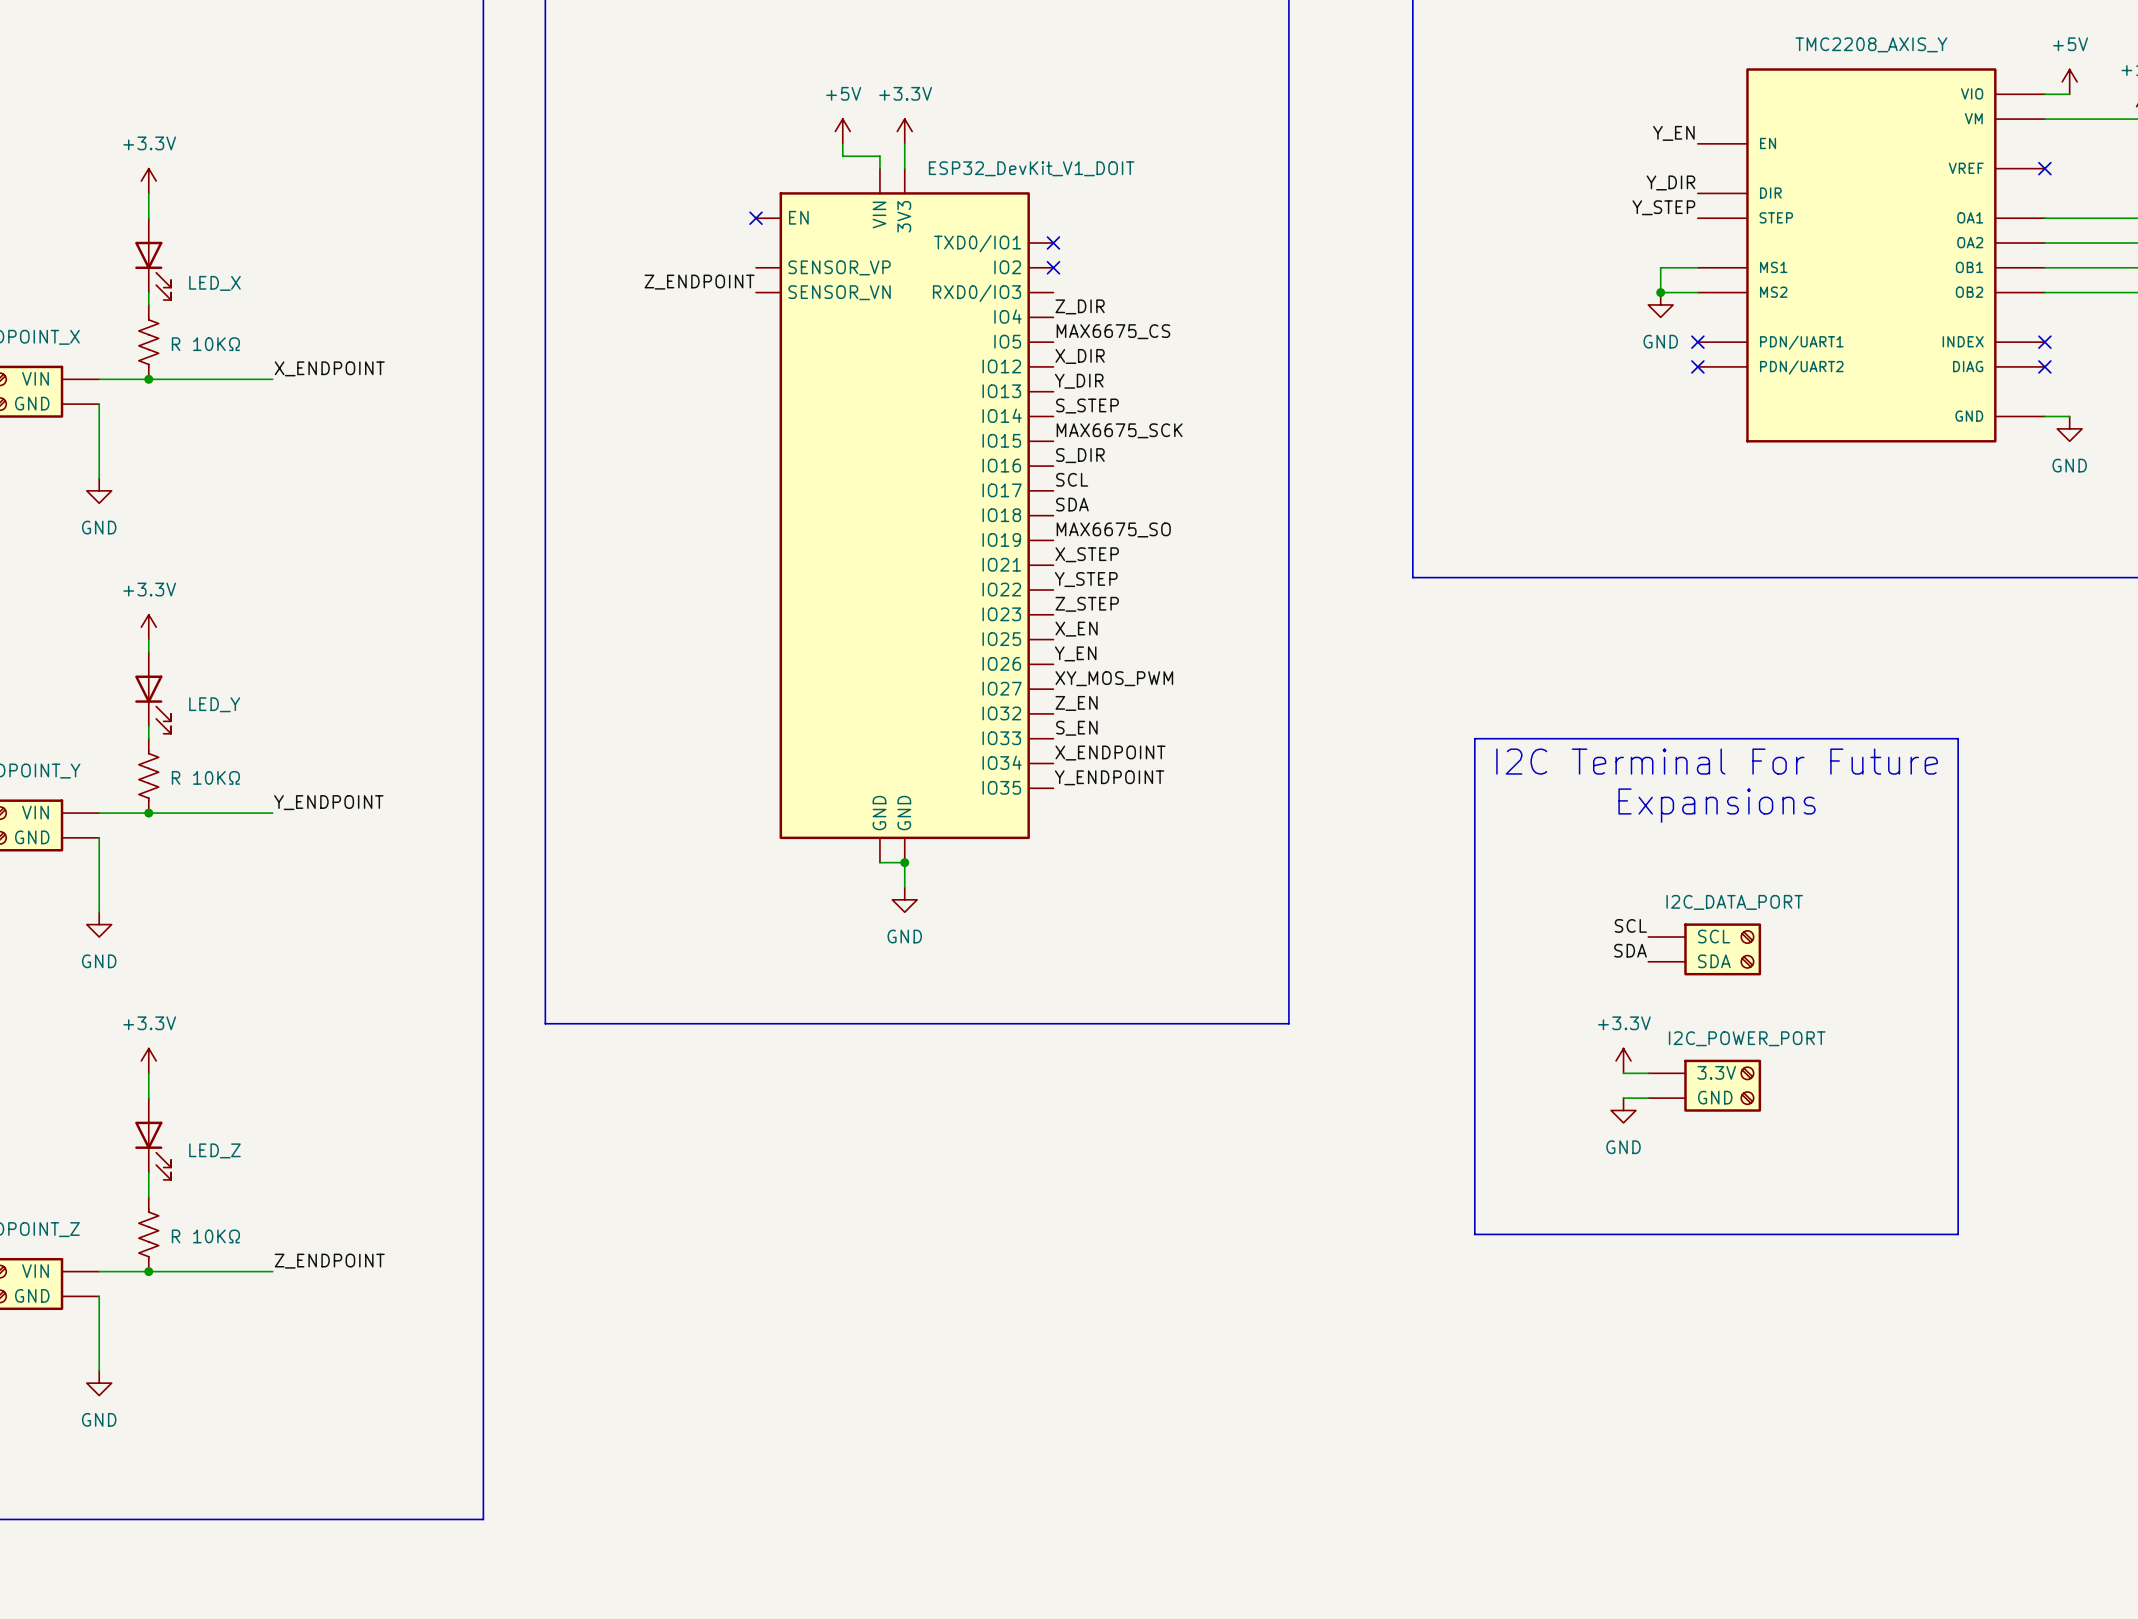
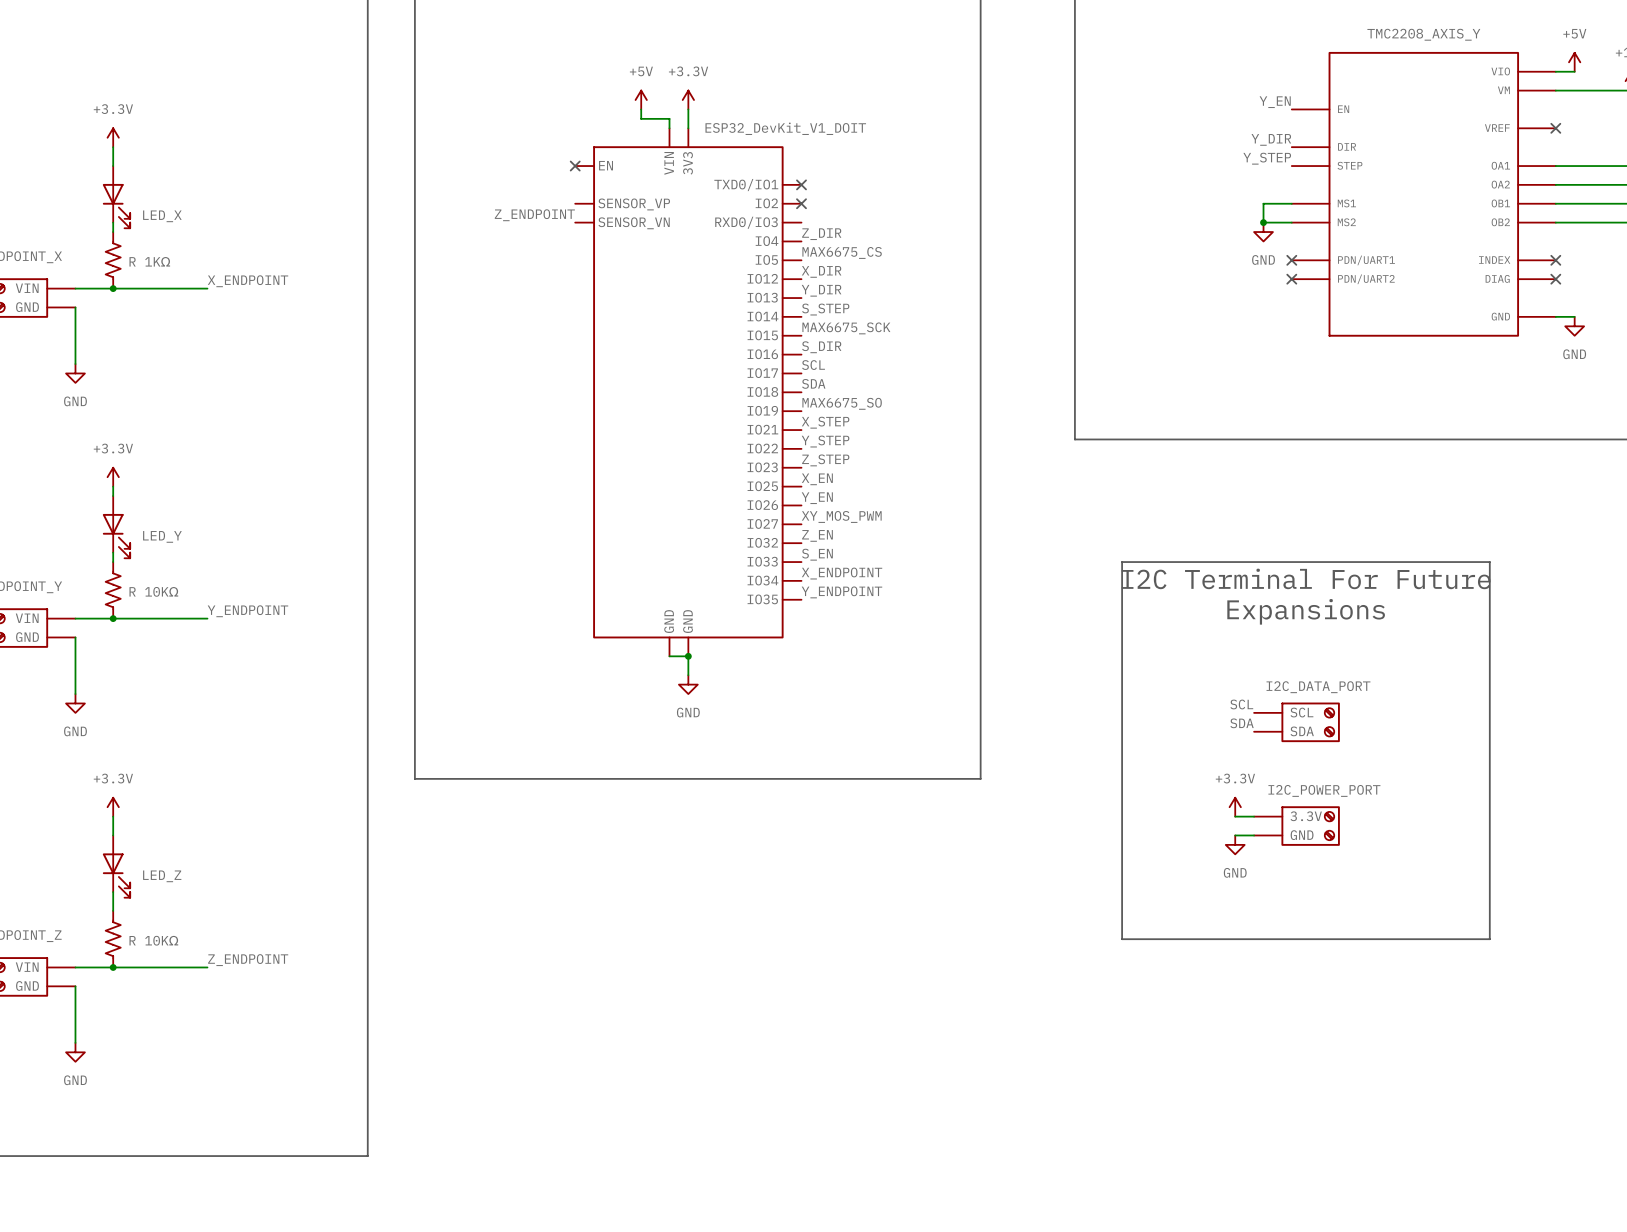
part value: R 10KΩ (205, 344) -> R 1KΩ (149, 261)

